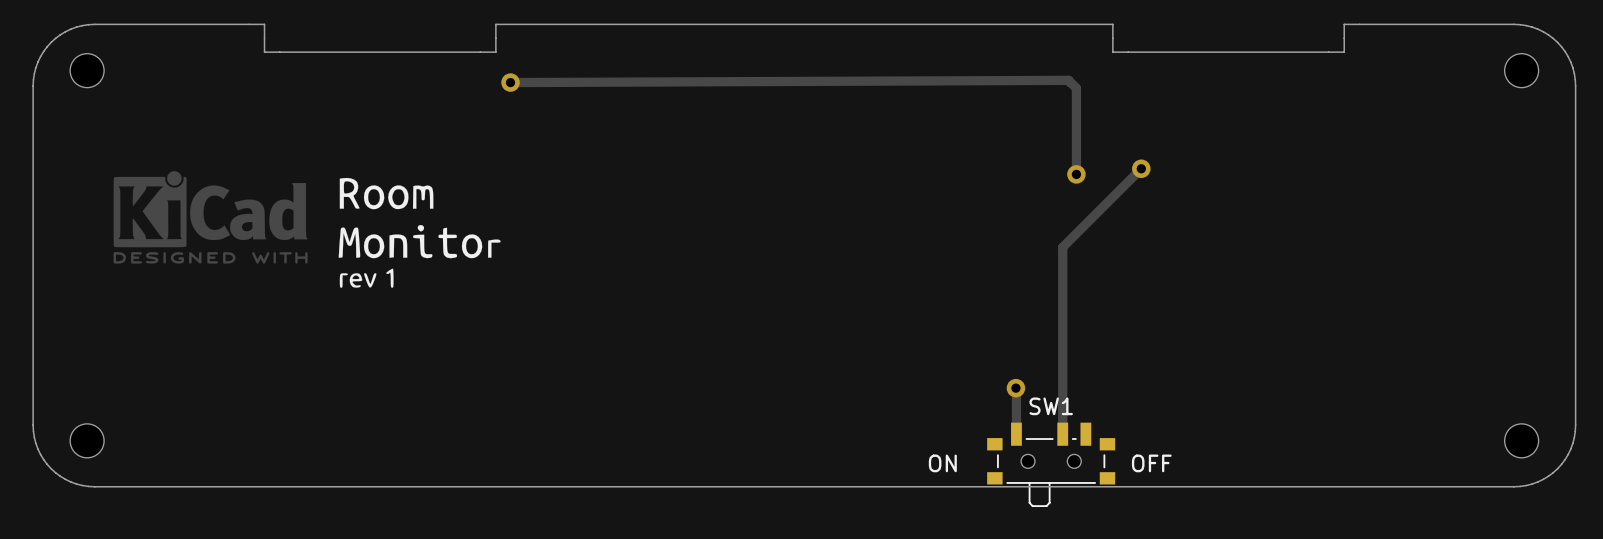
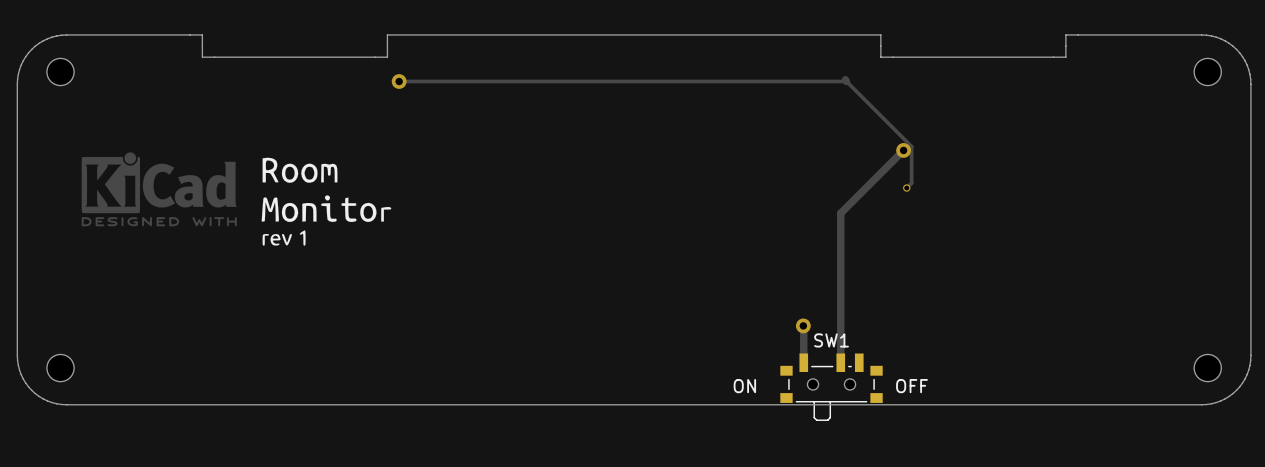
track: (510, 82) (1068, 80) (1076, 88) (1076, 174) -> (399, 81) (846, 81) (911, 146) (911, 183) (906, 188)
via: (1076, 174) -> none
via: none -> (906, 188)

